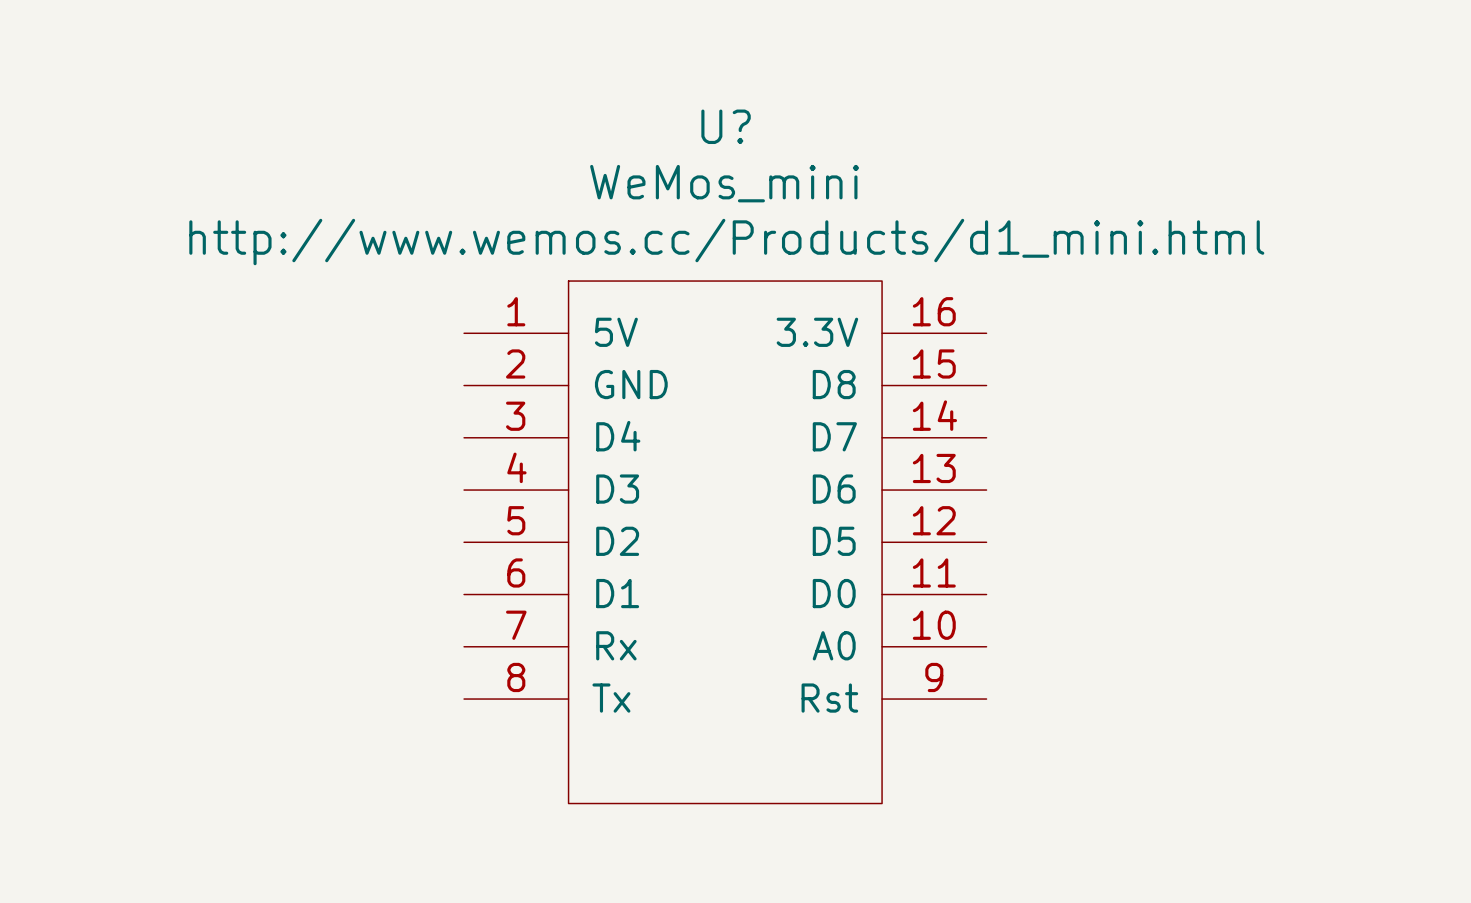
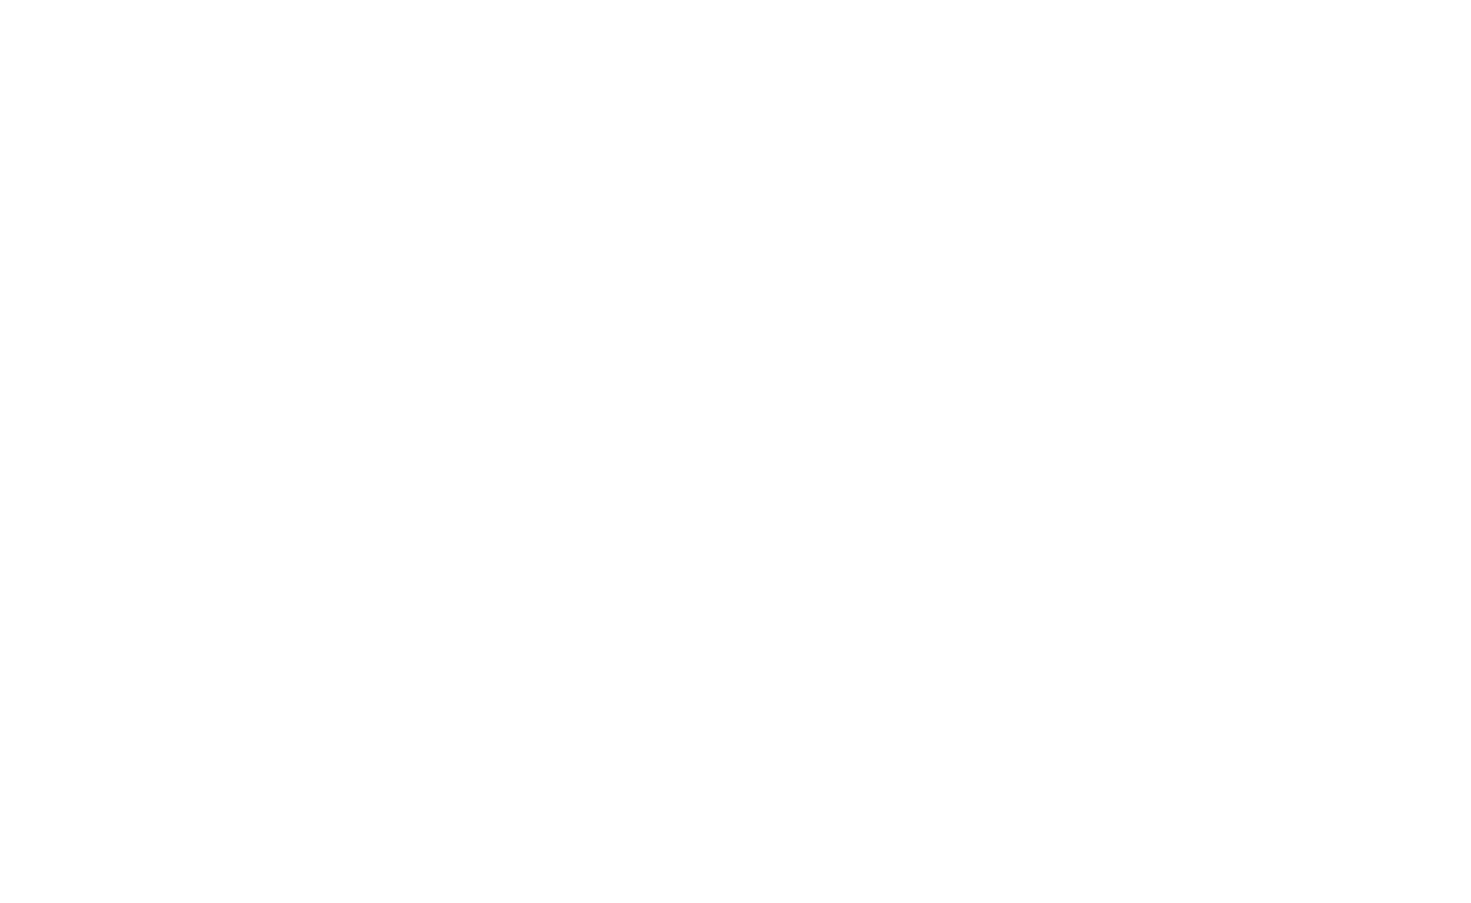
U?: WeMos_mini (725, 542) -> none

